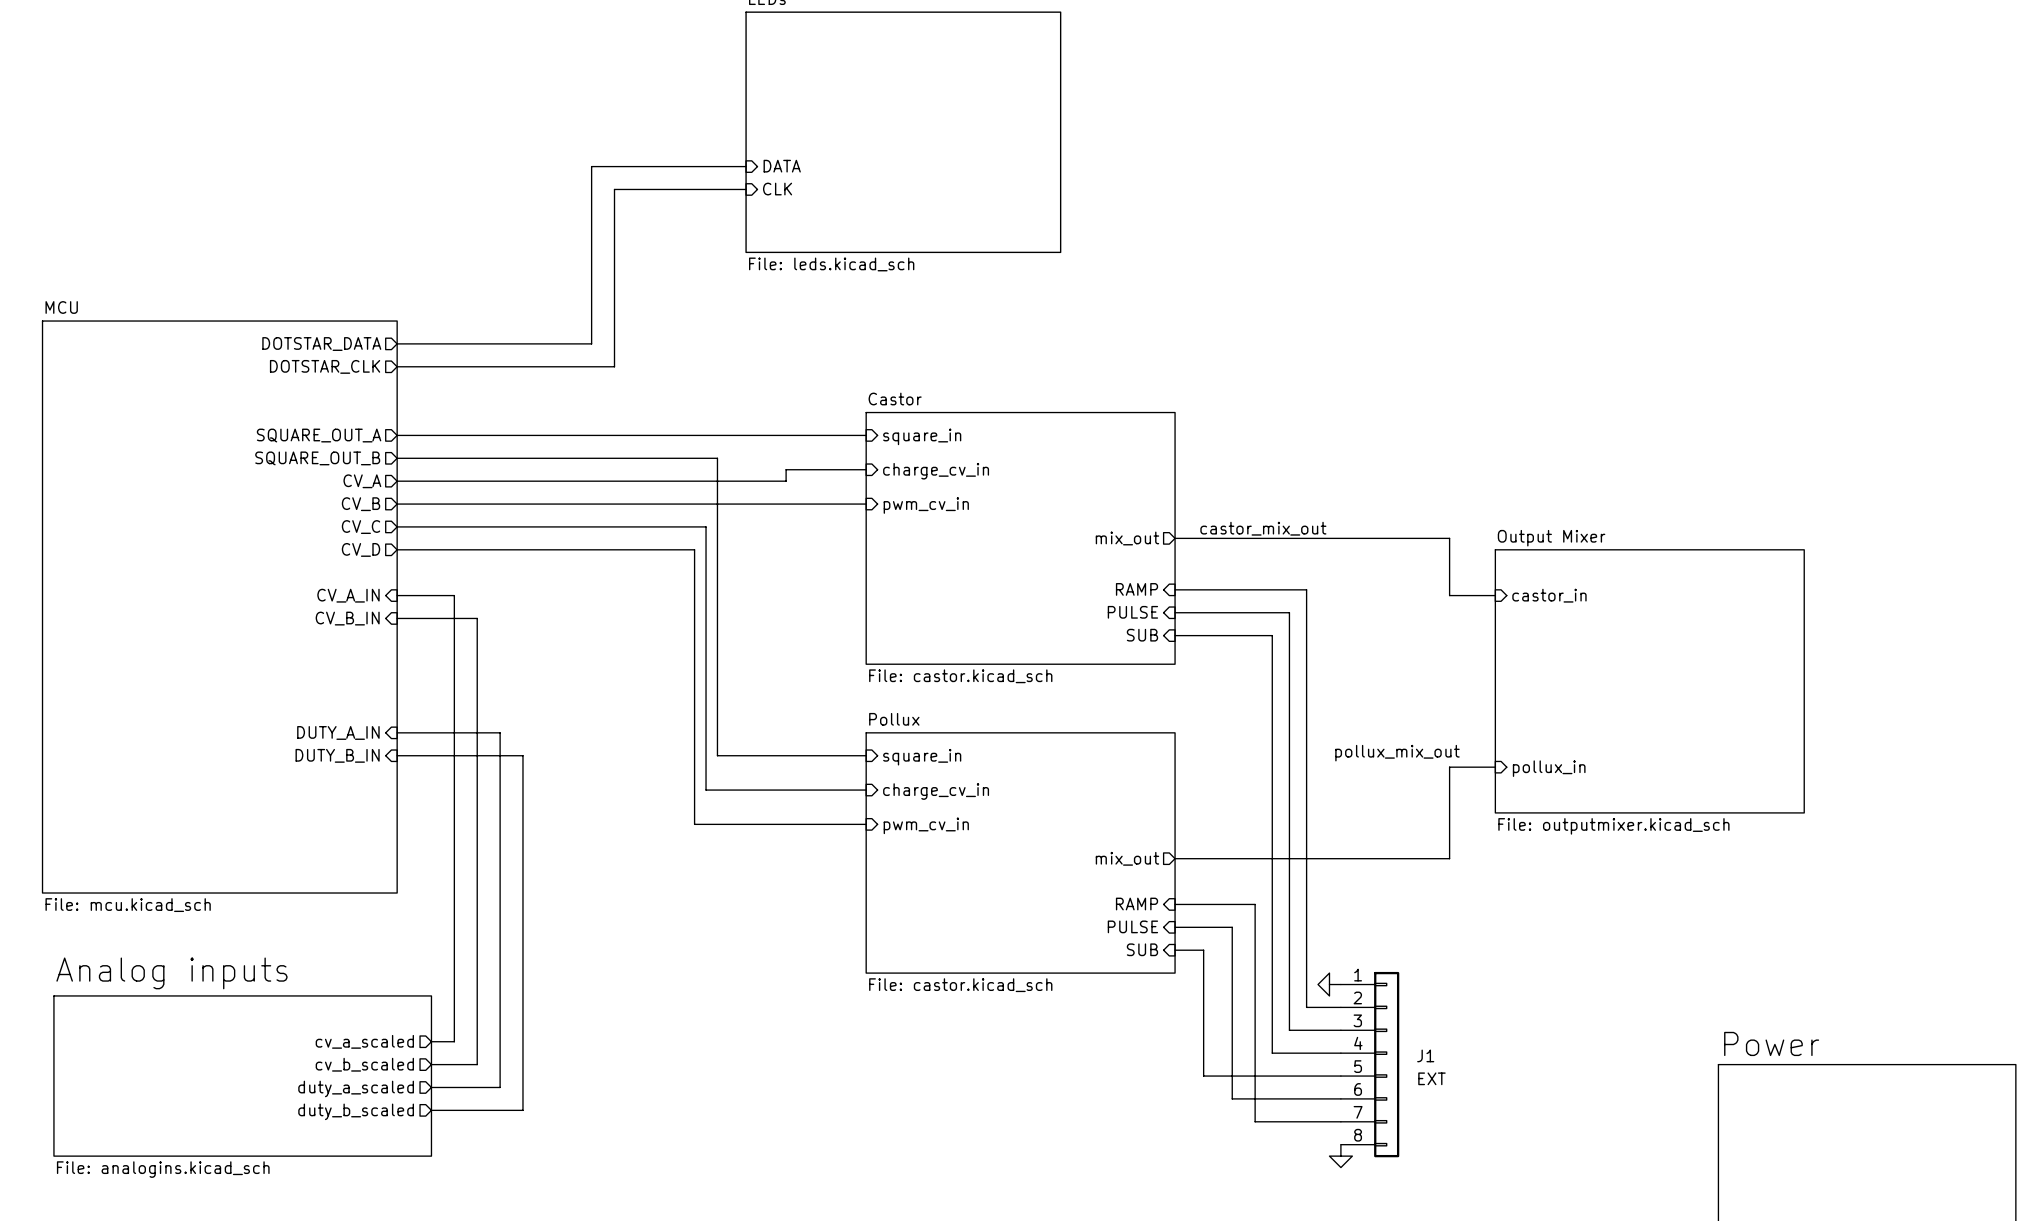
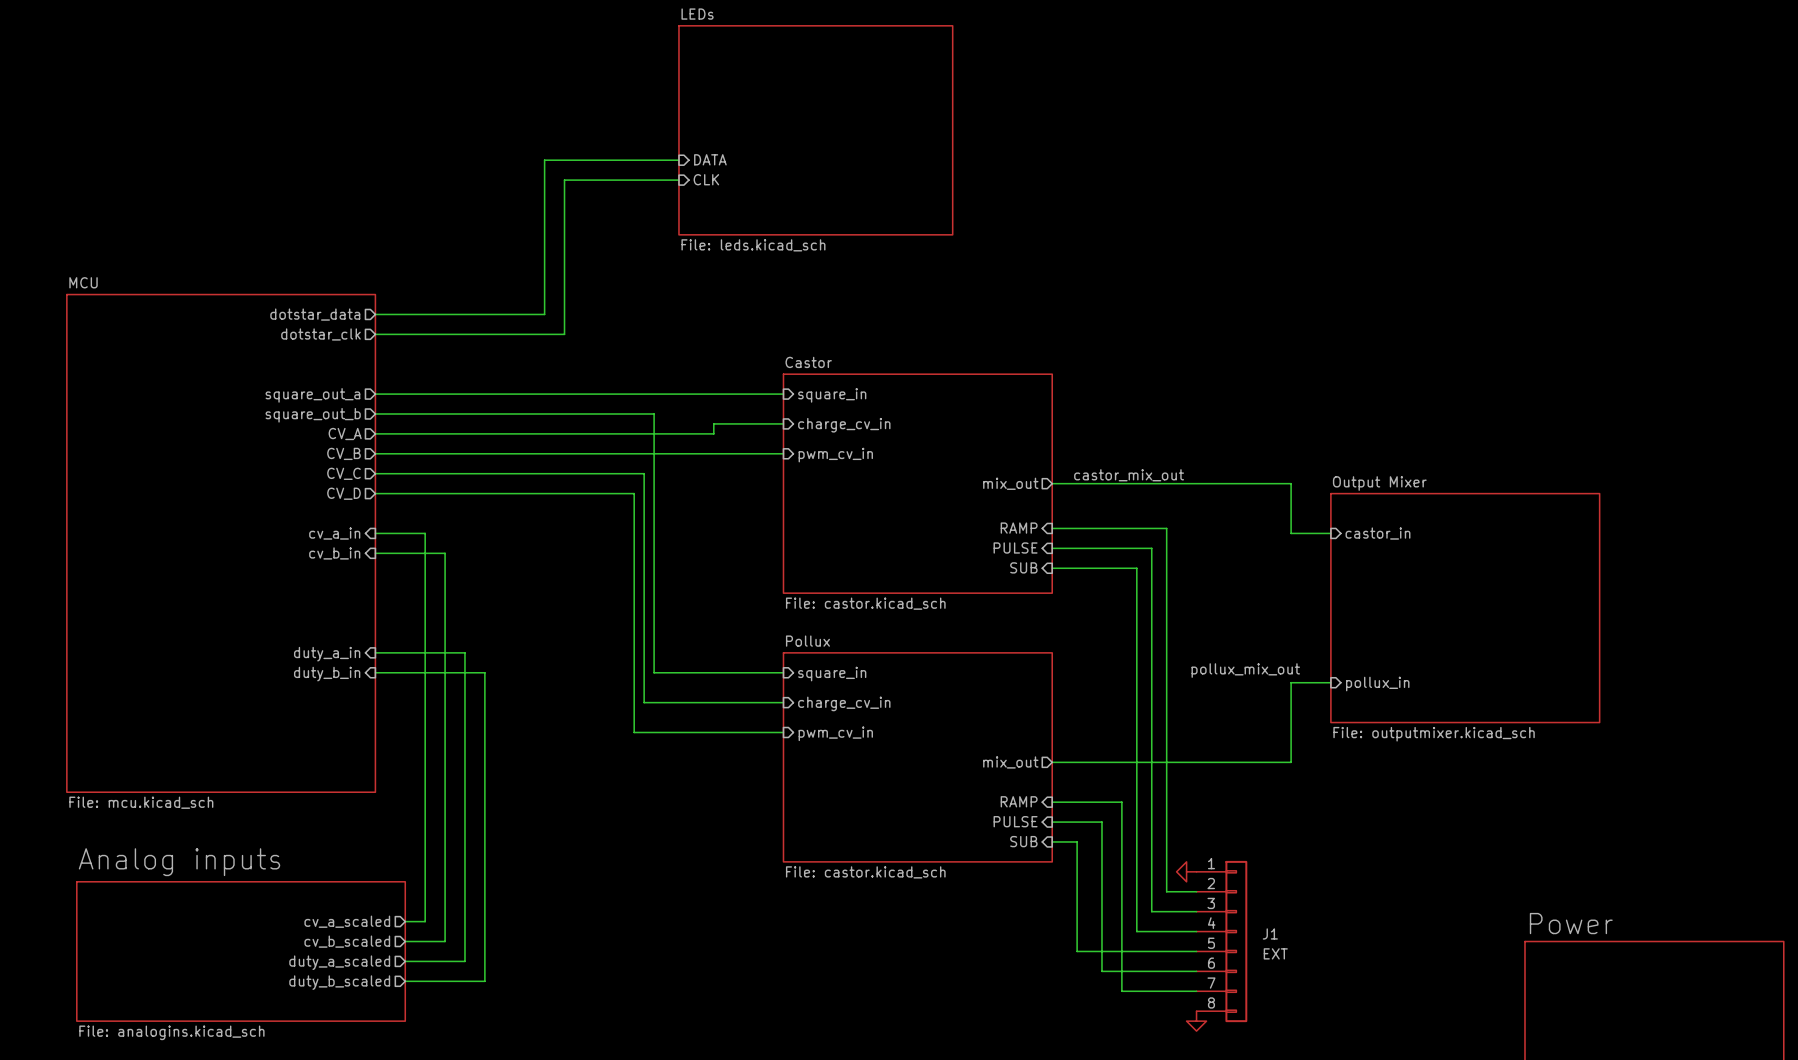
sheet pin: DOTSTAR_DATA (321, 344) -> dotstar_data (315, 314)
sheet pin: DOTSTAR_CLK (325, 366) -> dotstar_clk (320, 334)
sheet pin: SQUARE_OUT_A (319, 435) -> square_out_a (312, 395)
sheet pin: SQUARE_OUT_B (317, 458) -> square_out_b (313, 415)
sheet pin: CV_A_IN (348, 595) -> cv_a_in (334, 533)
sheet pin: CV_B_IN (347, 618) -> cv_b_in (334, 553)
sheet pin: DUTY_A_IN (338, 732) -> duty_a_in (327, 654)
sheet pin: DUTY_B_IN (337, 755) -> duty_b_in (327, 674)

